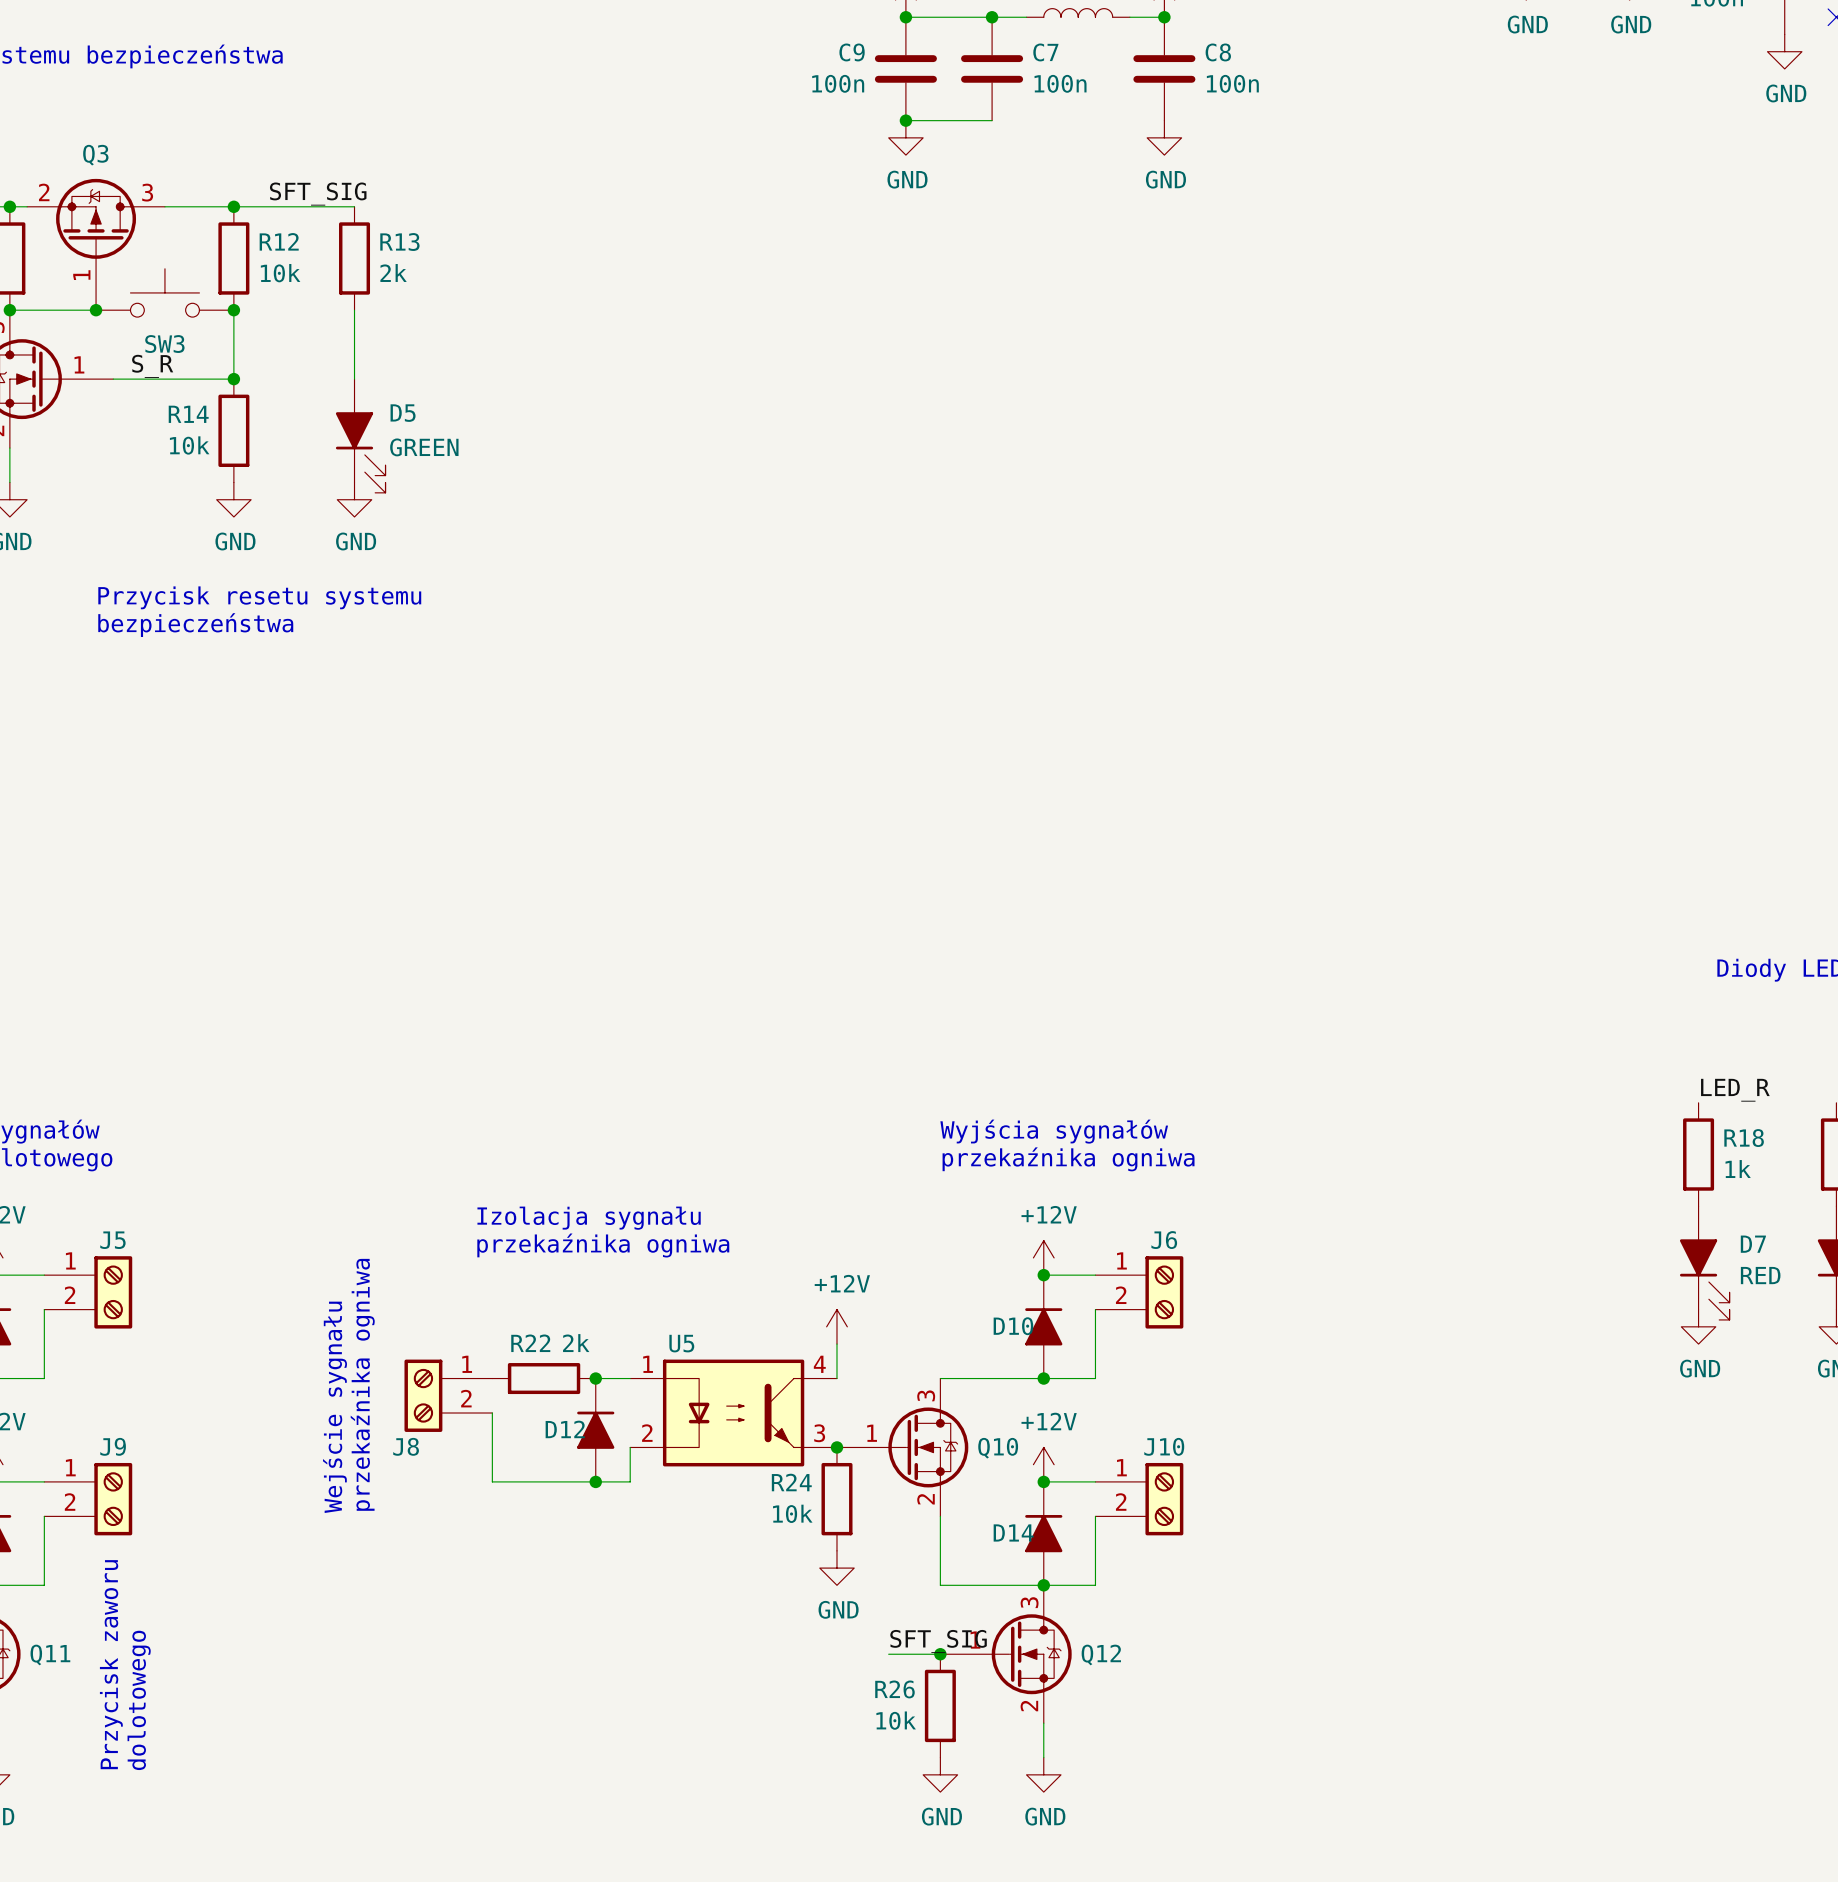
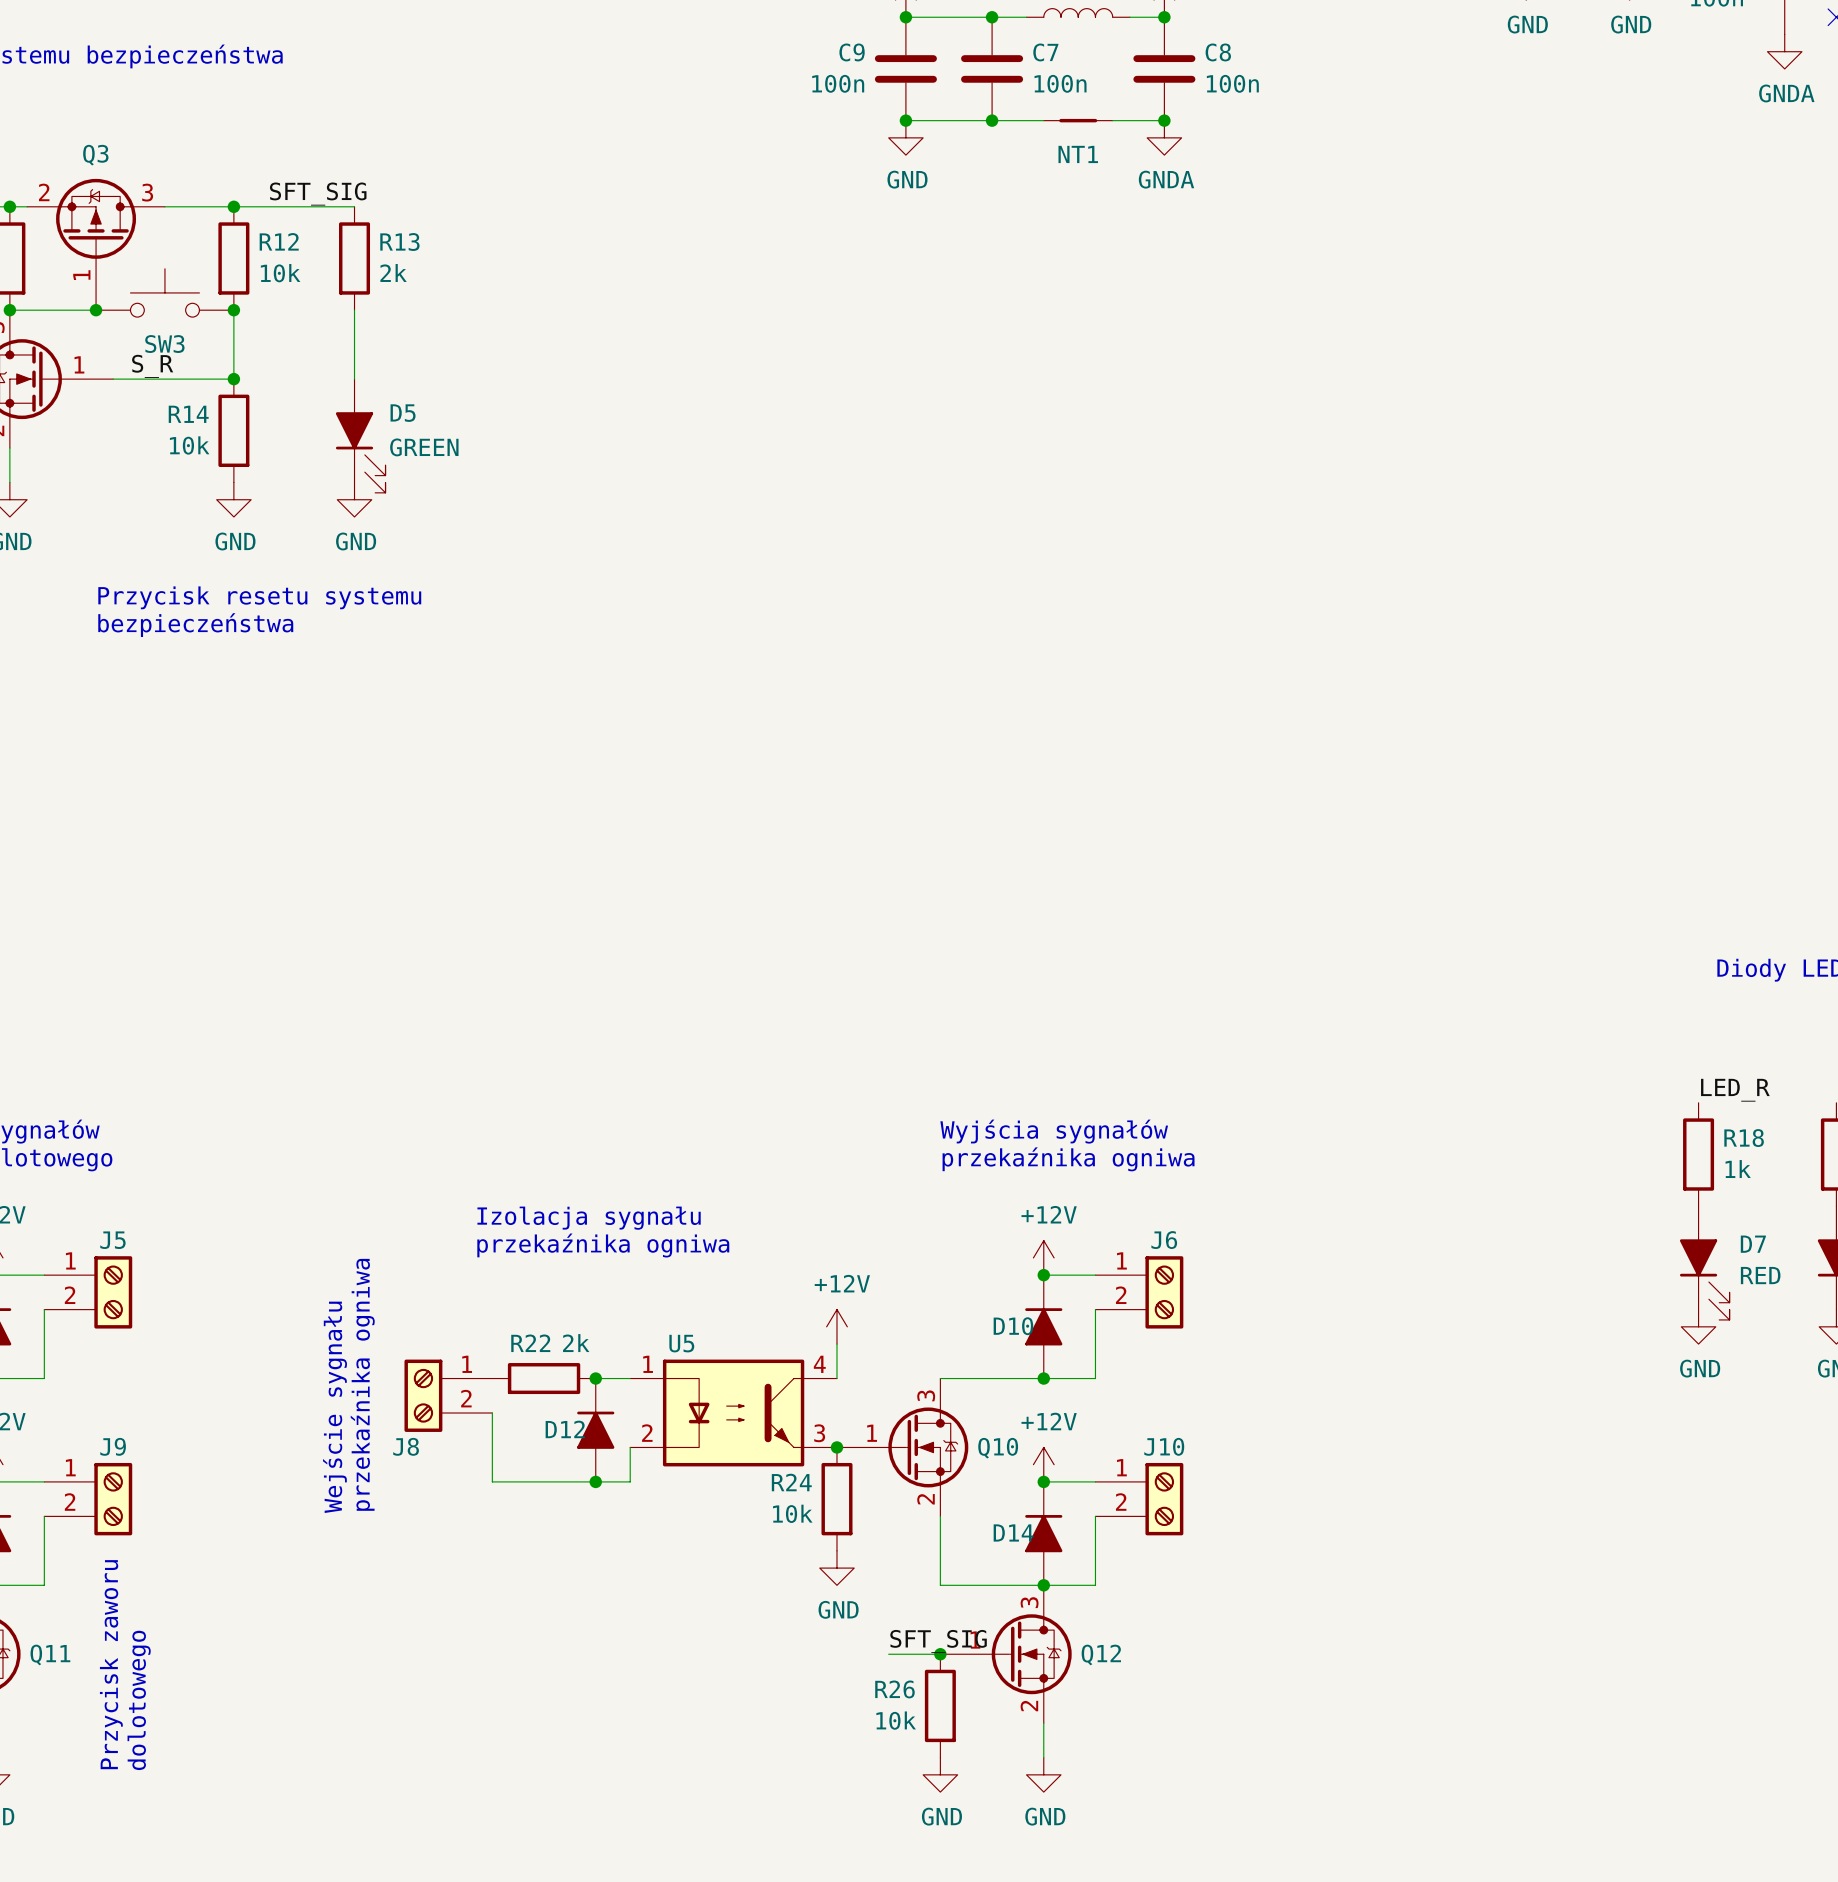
power symbol: GND (1784, 51) -> GNDA (1784, 51)
wire: none -> (992, 120) (1043, 120)
junction: none -> (992, 120)
NT1: none -> (1078, 120)
wire: none -> (1112, 120) (1164, 120)
junction: none -> (1164, 120)
power symbol: GND (1164, 137) -> GNDA (1164, 137)

